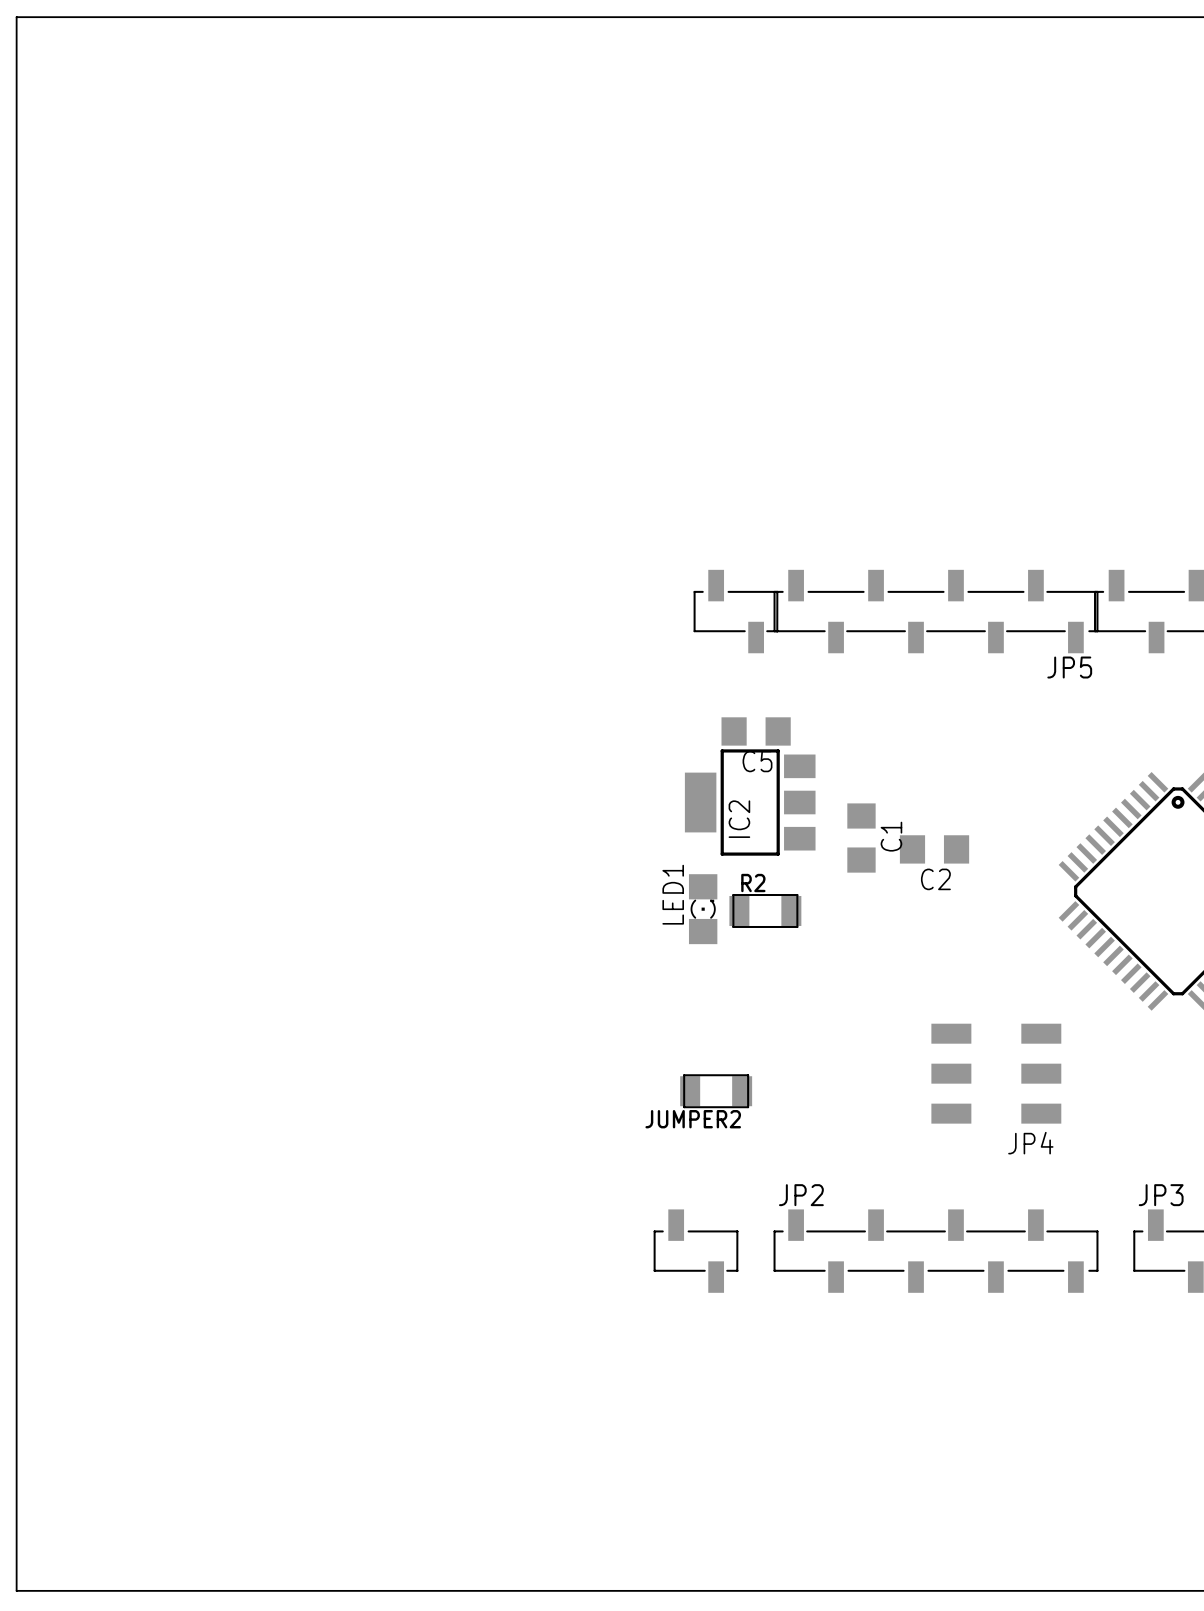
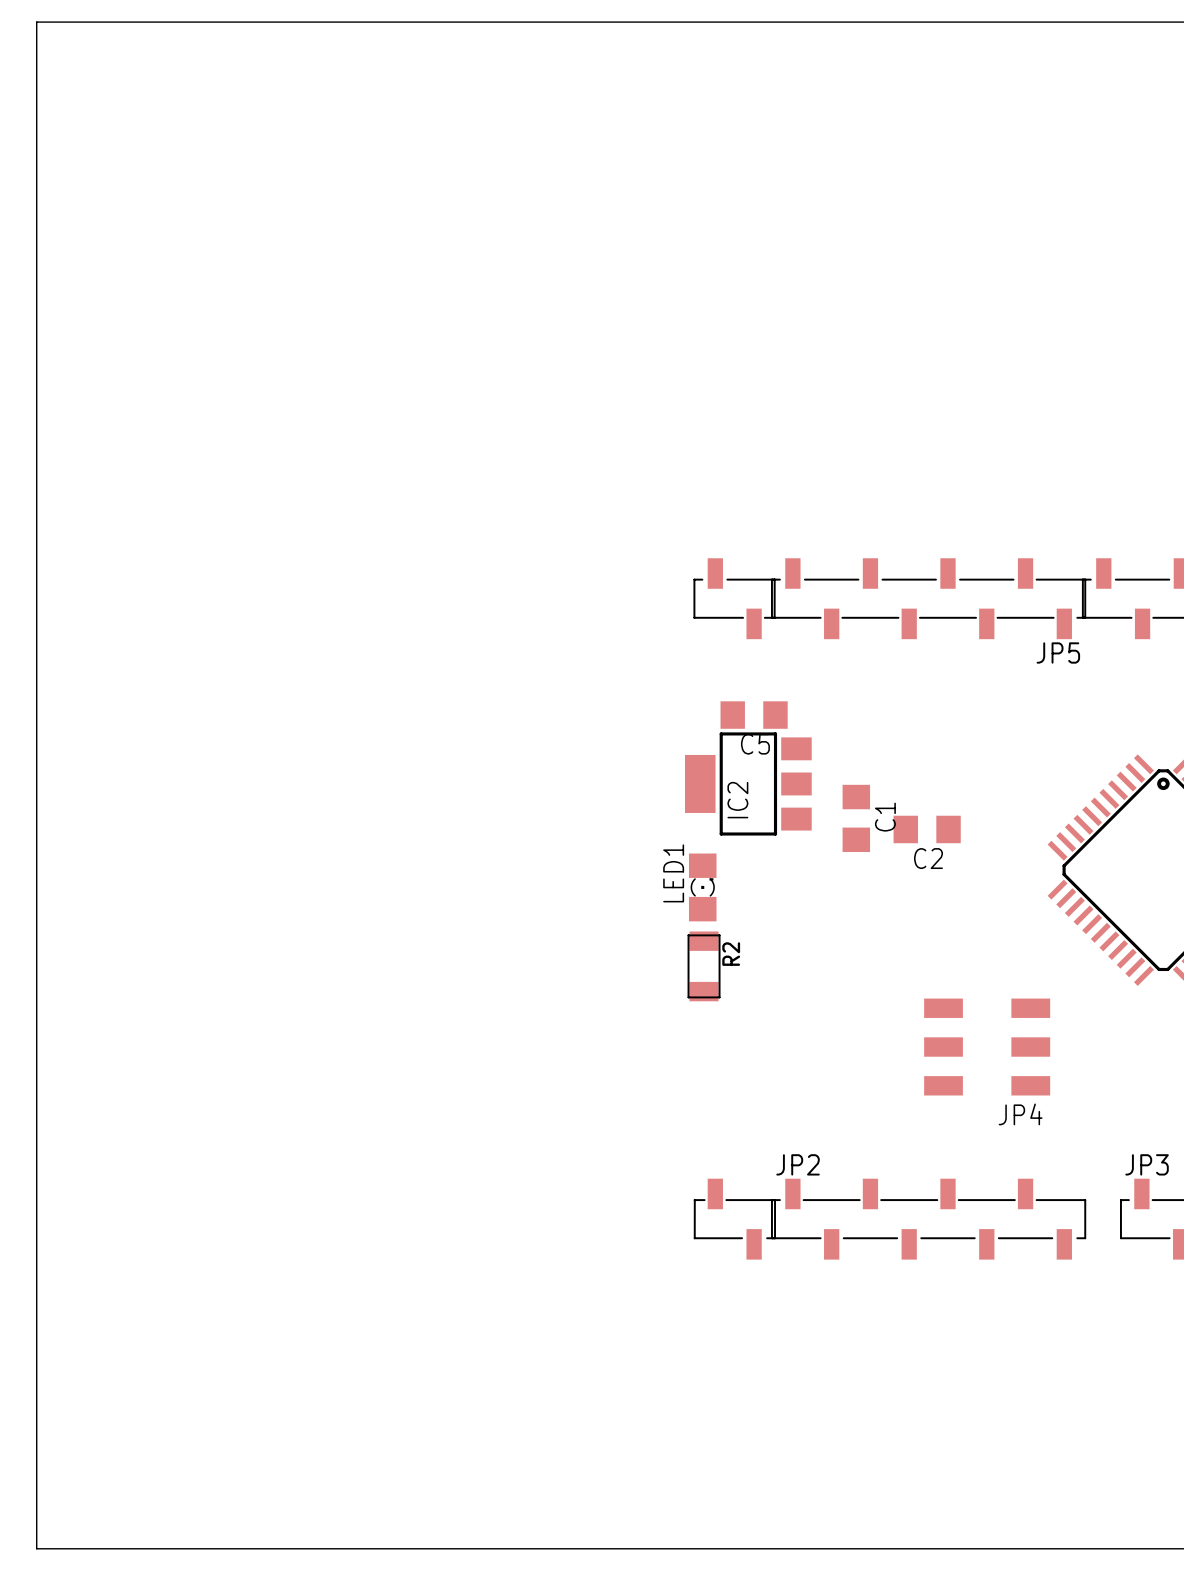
R2 rotation: 0° (765, 910) -> 90° clockwise (704, 966)
R2 position: (765, 910) -> (704, 966)
JUMPER2: (716, 1091) -> none
part rotation: 0° (696, 1251) -> 180° (734, 1219)

